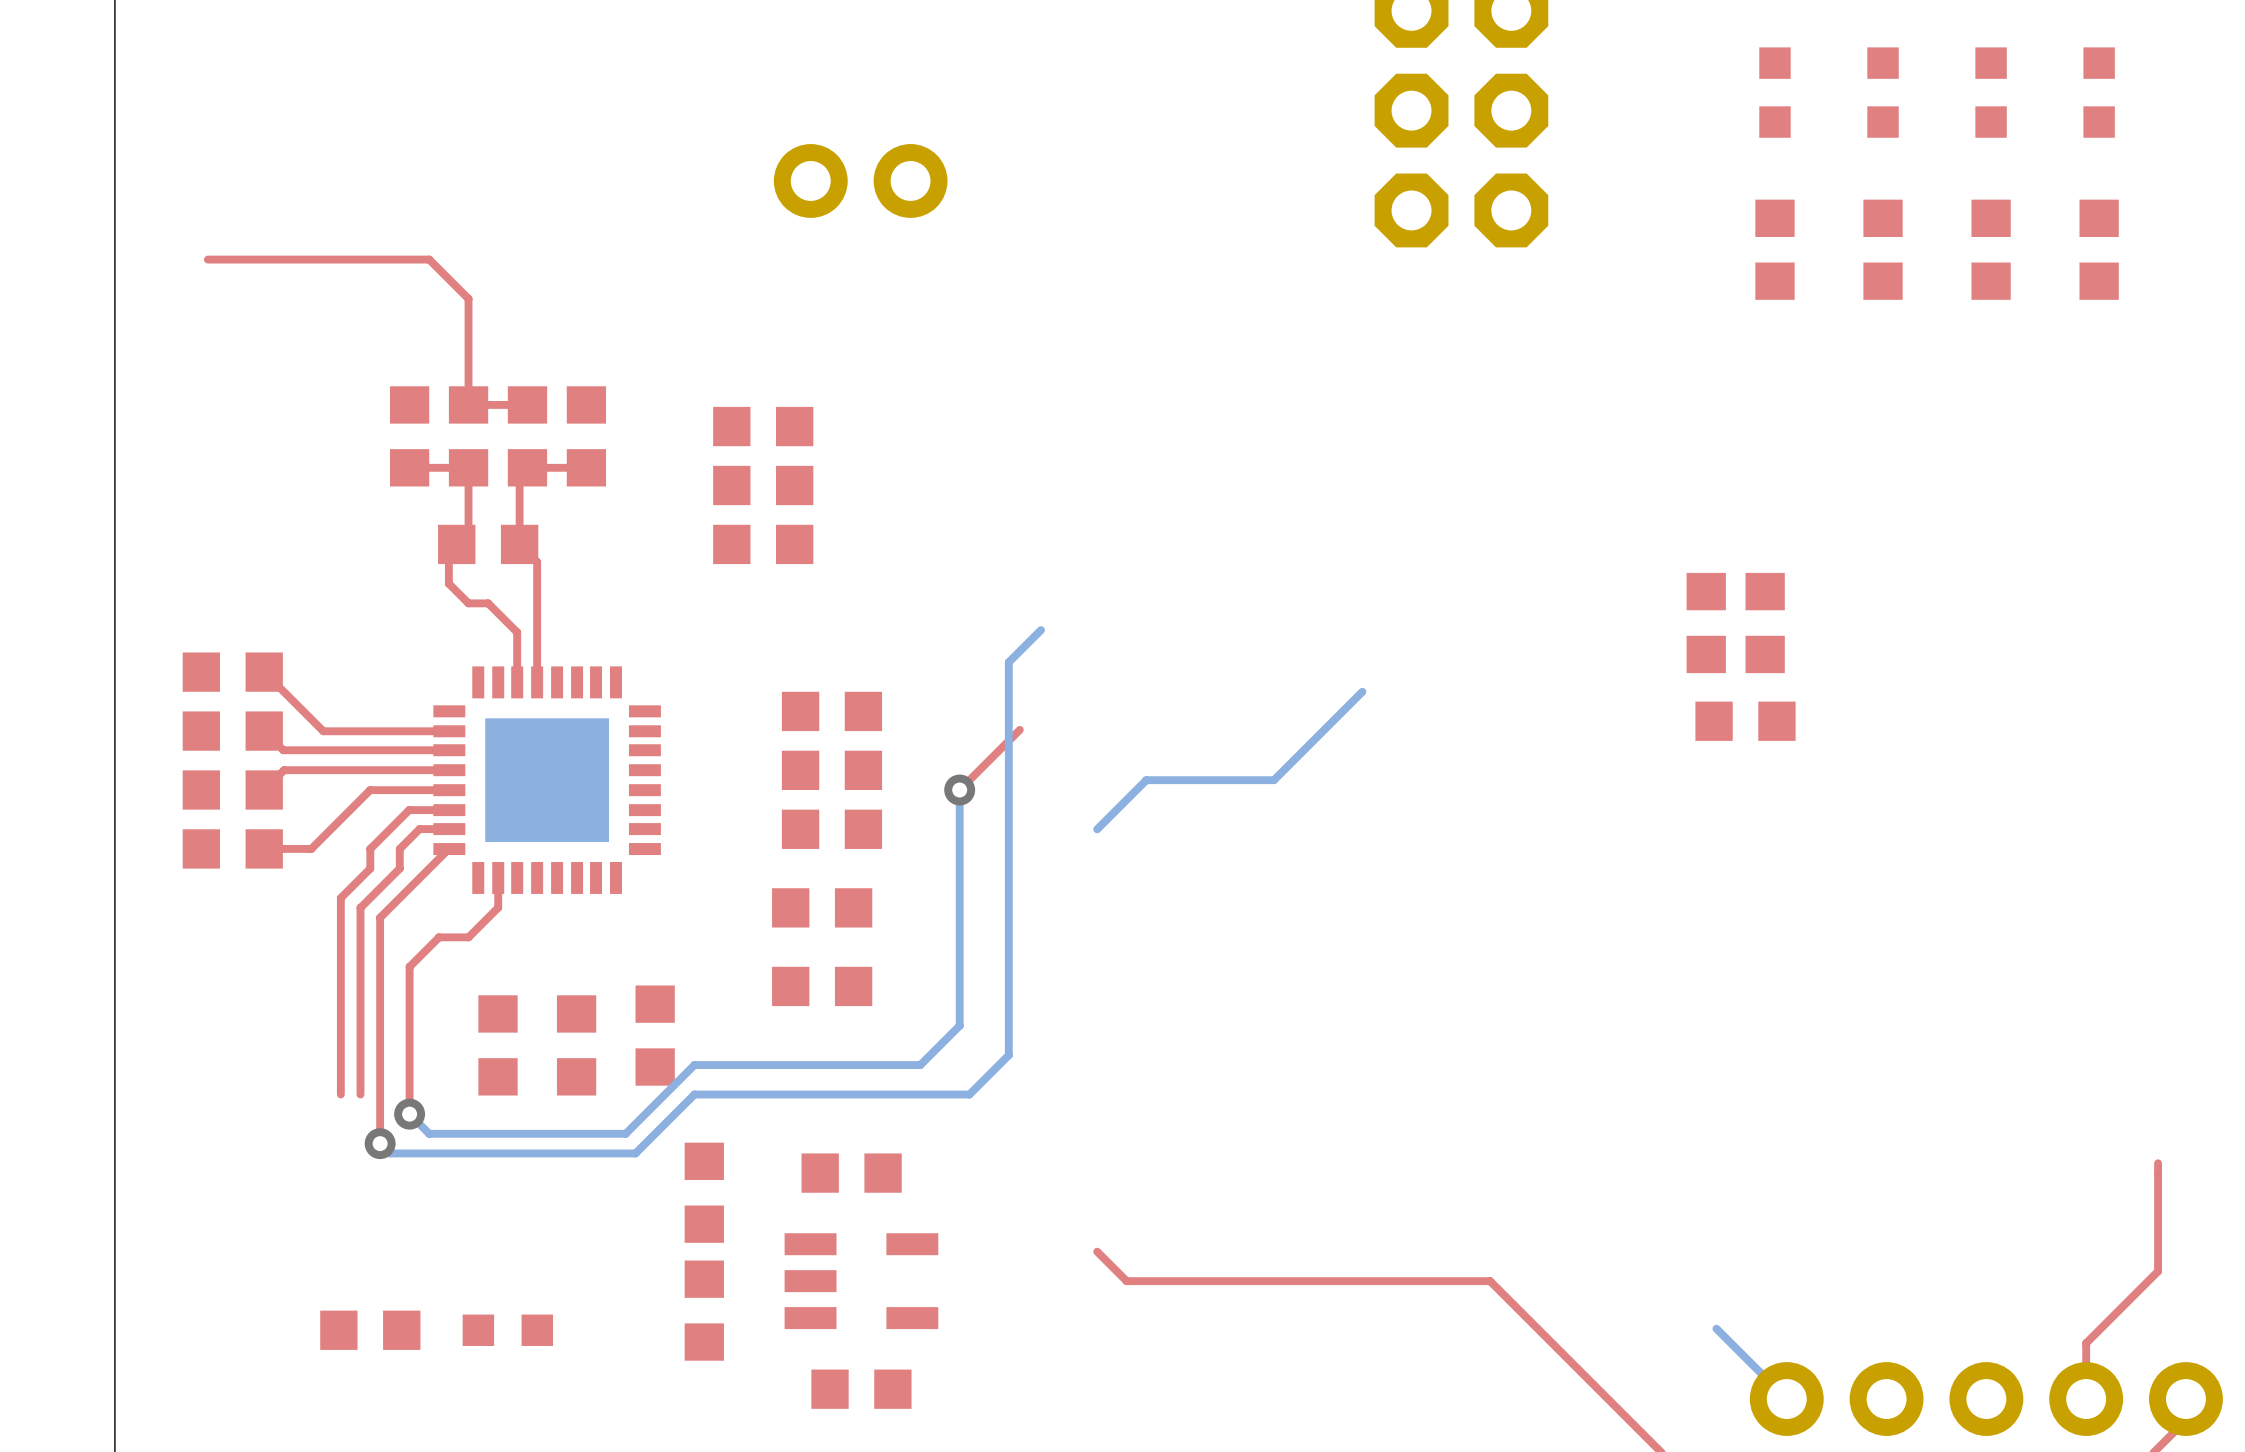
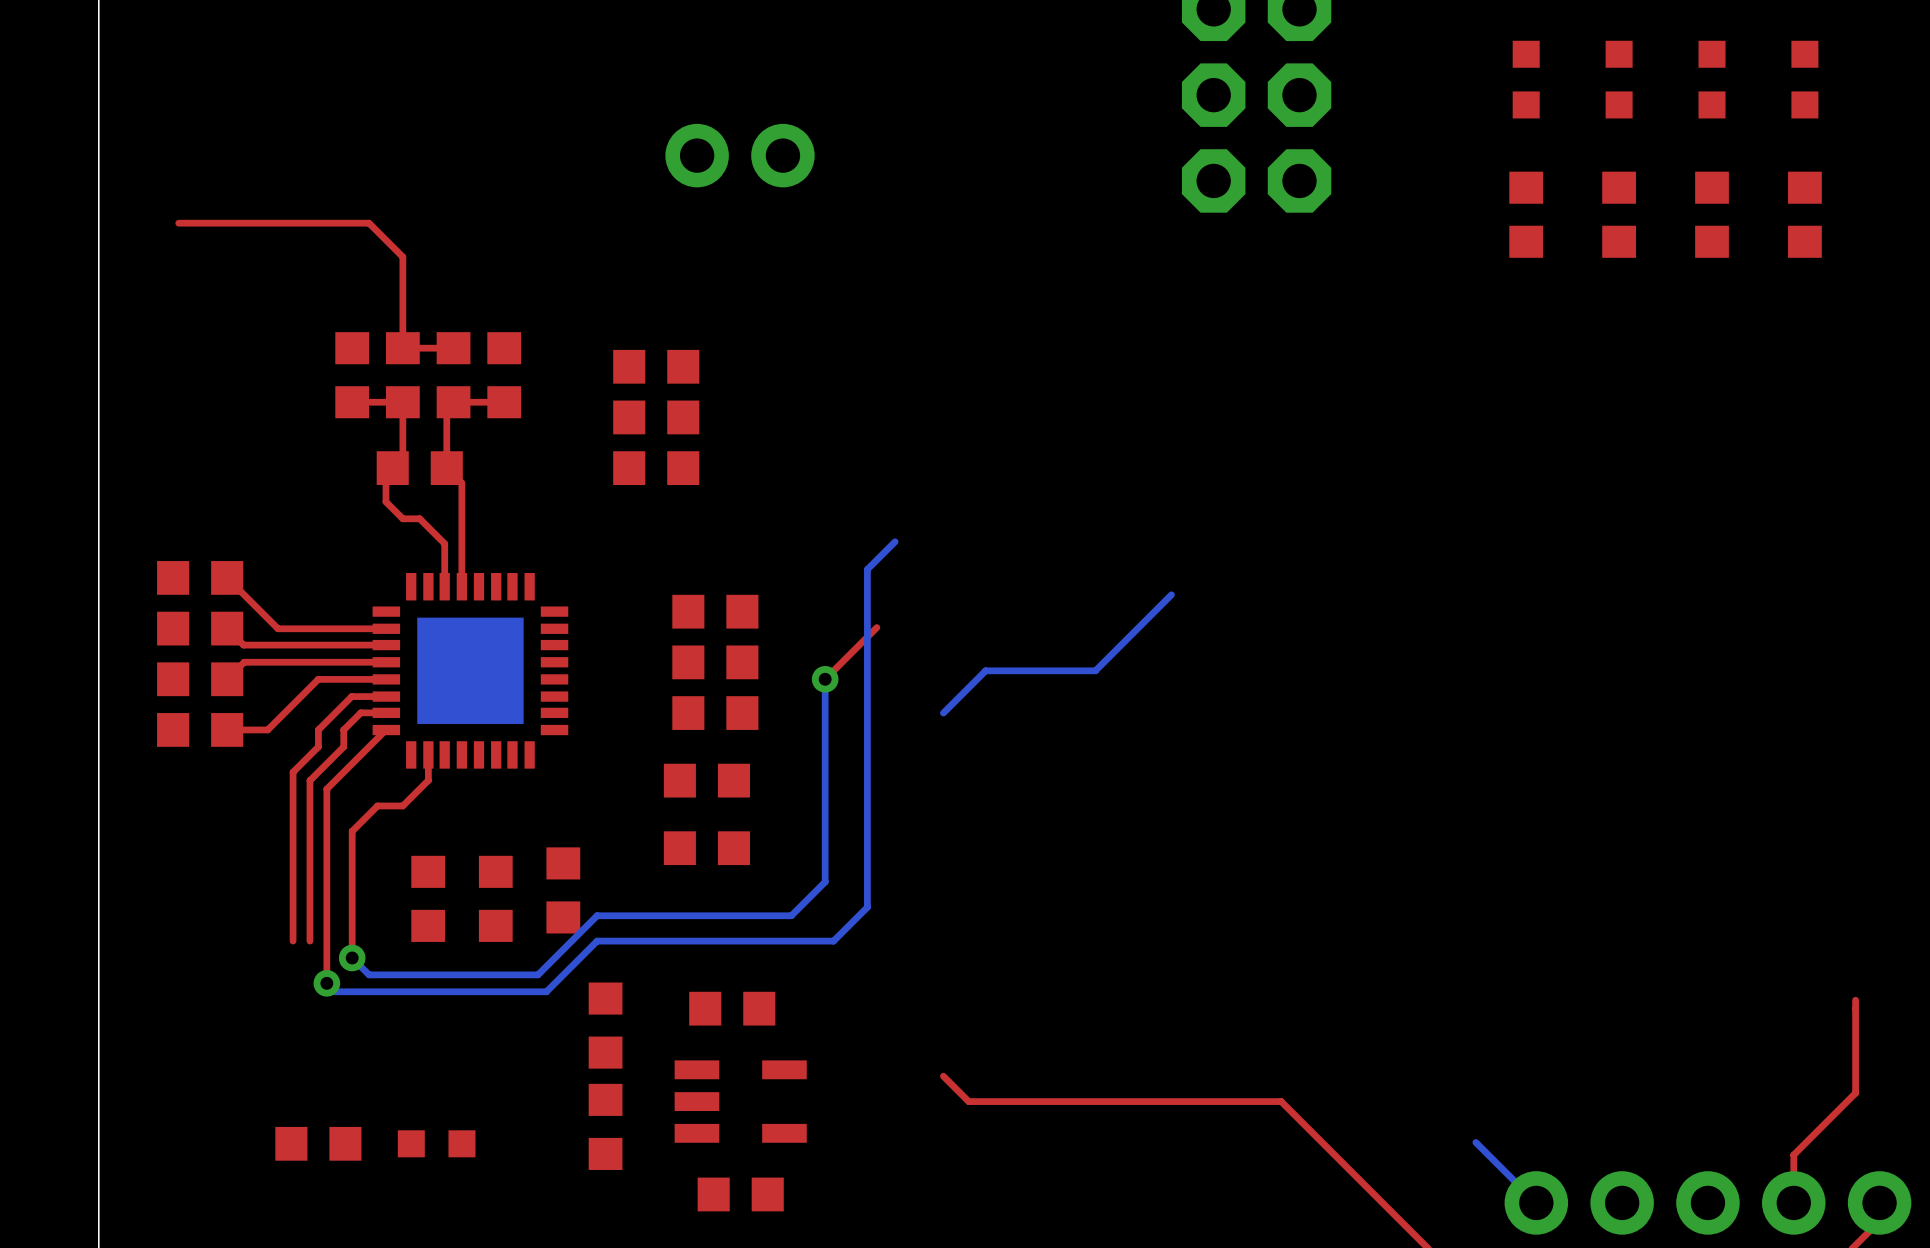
part: (1706, 623) -> none
part: (1765, 623) -> none
part: (1745, 721) -> none

